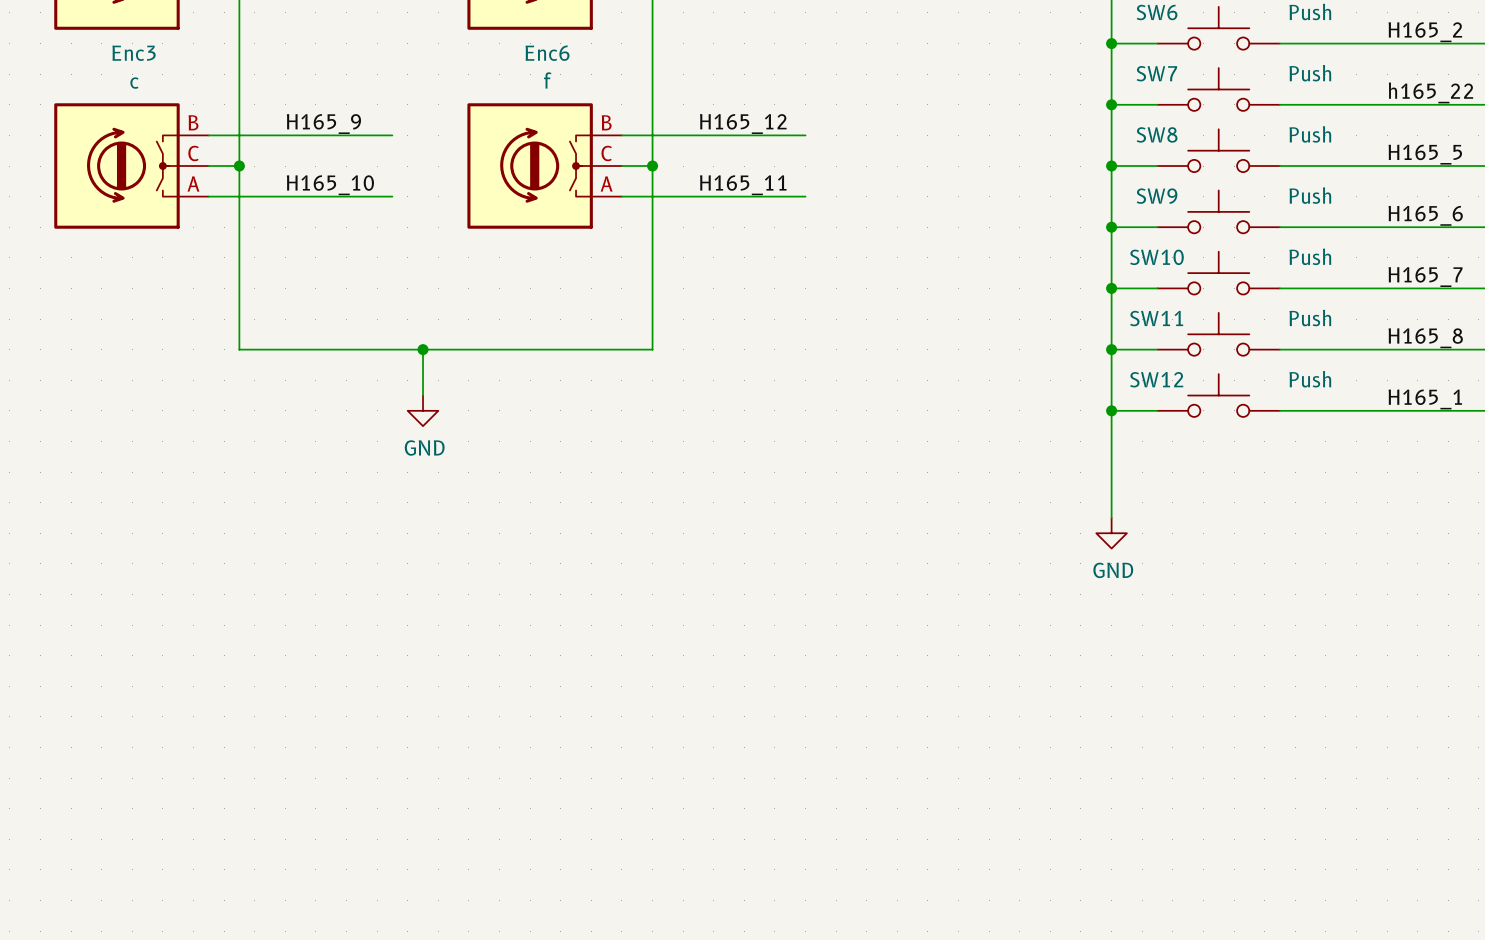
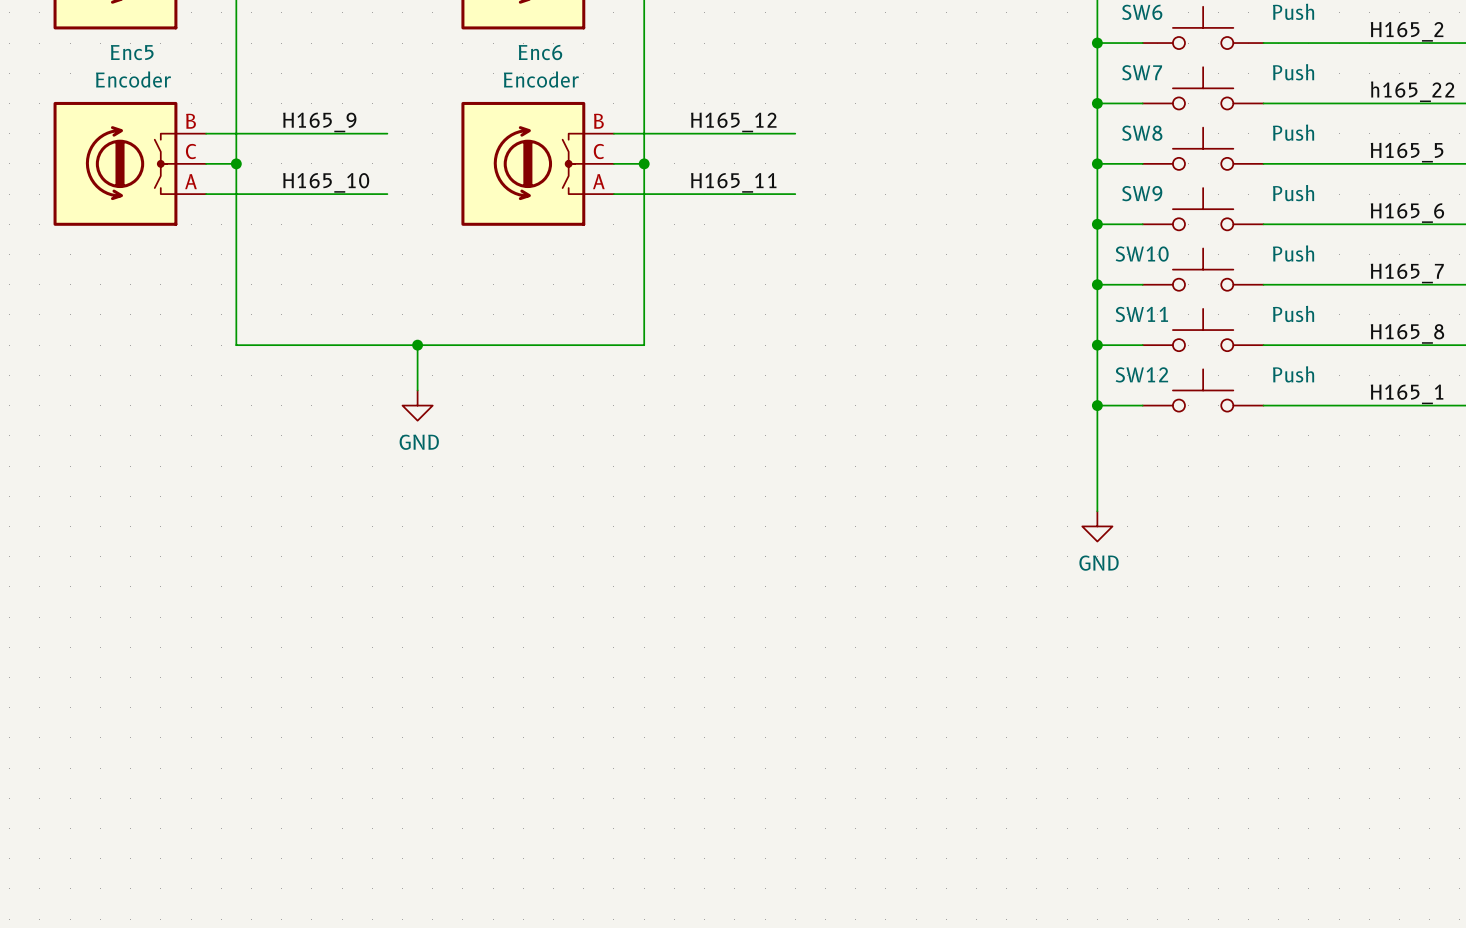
Enc3 name: Enc3 (134, 53) -> Enc5 (132, 52)
Enc6 value: f (547, 80) -> Encoder (541, 79)
Enc3 value: c (134, 83) -> Encoder (133, 79)

